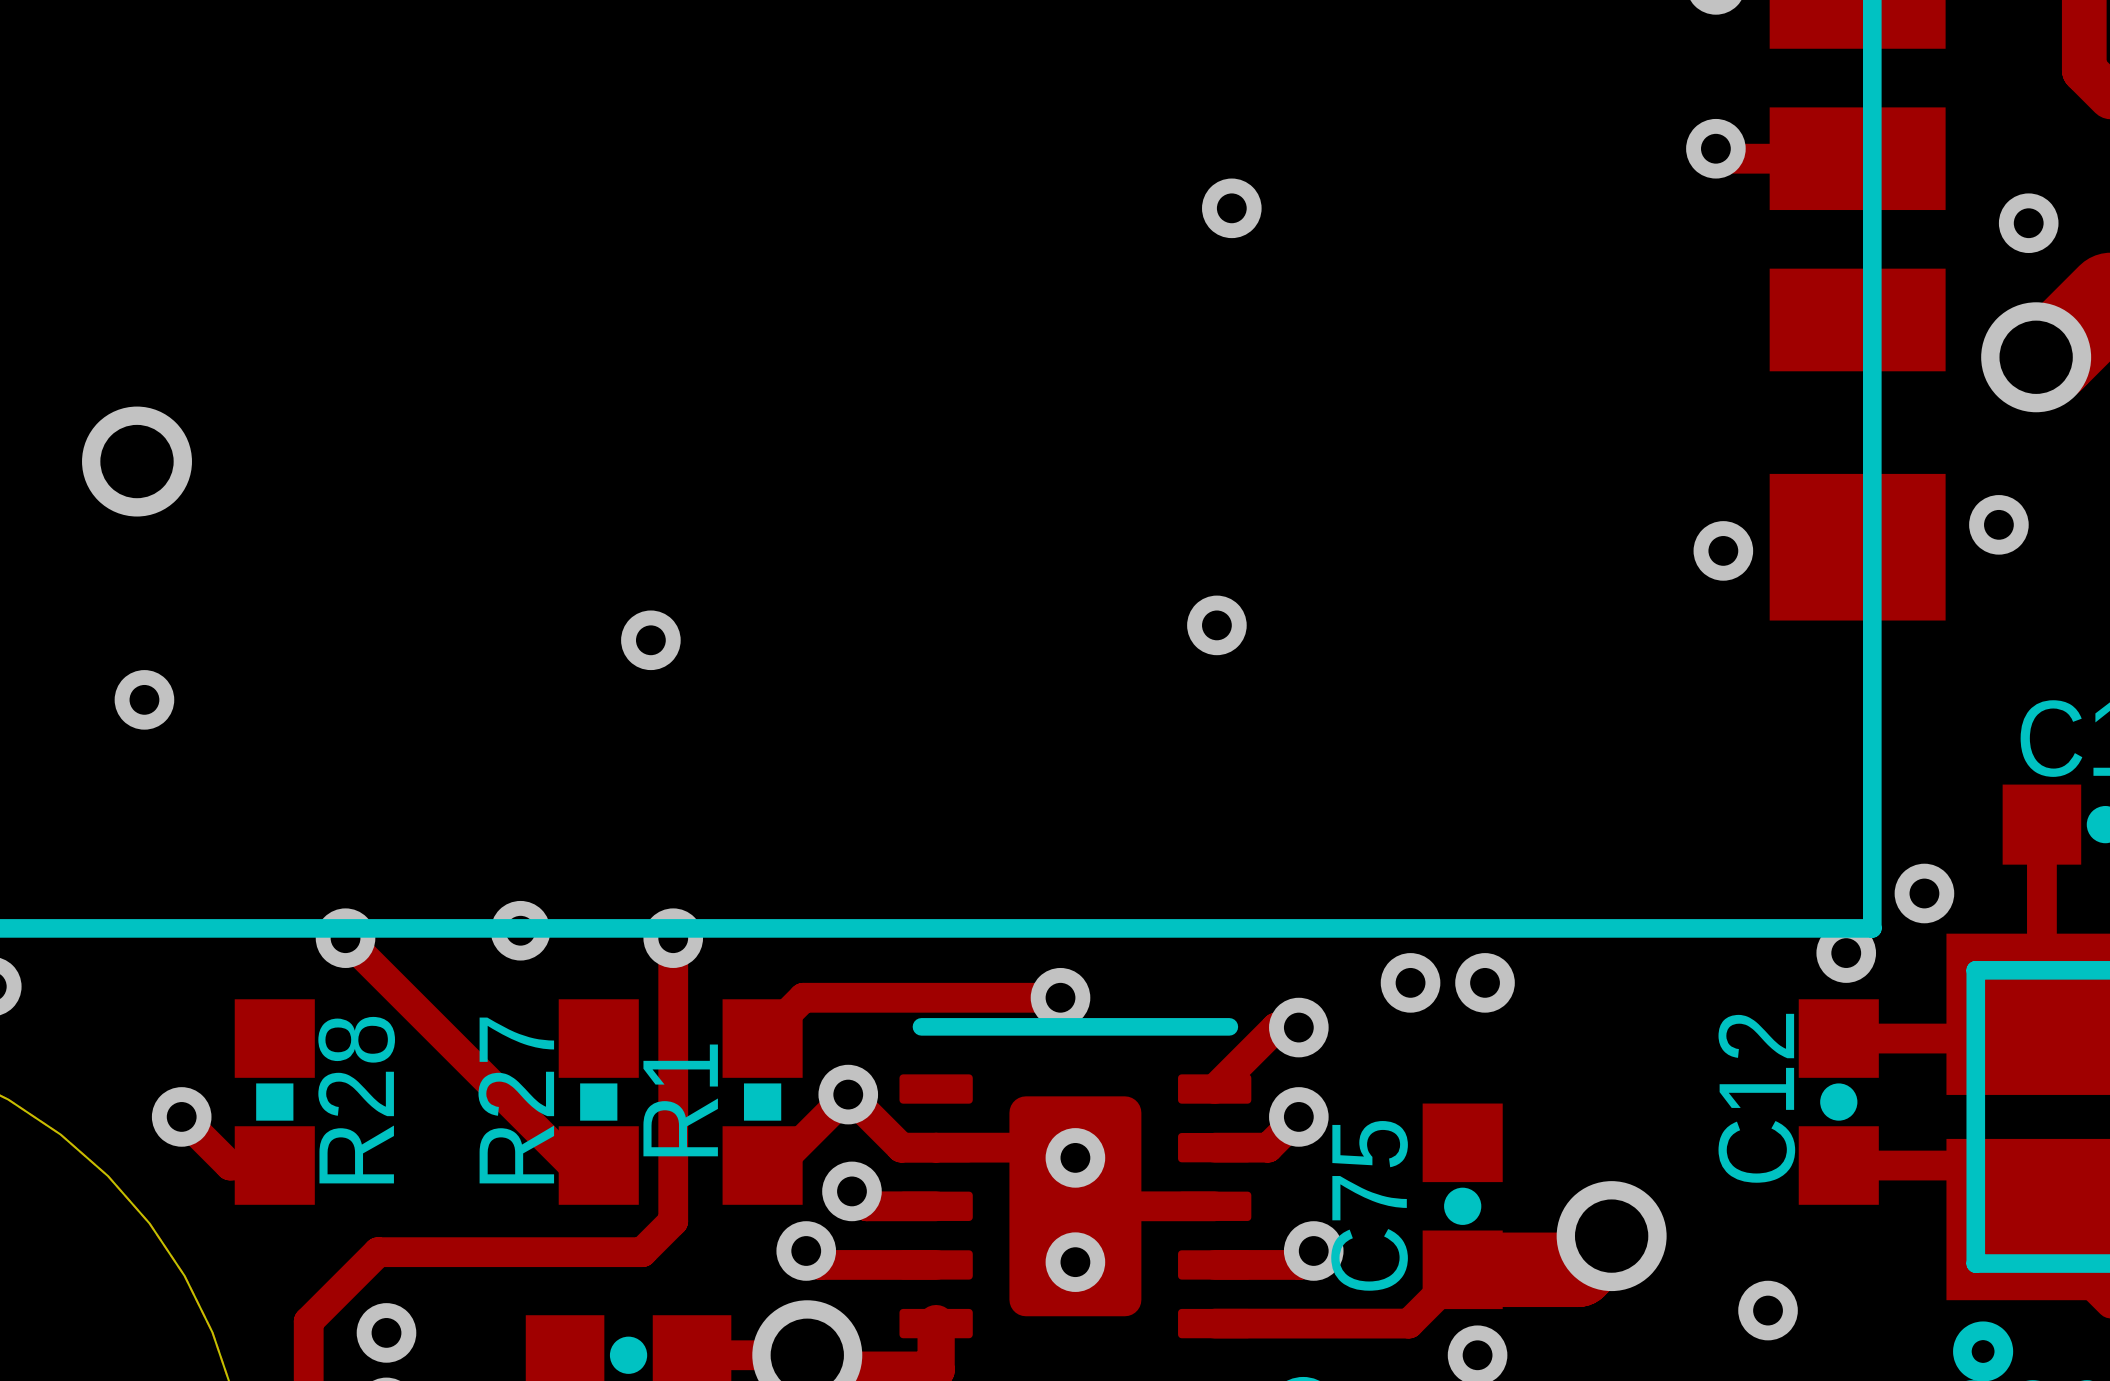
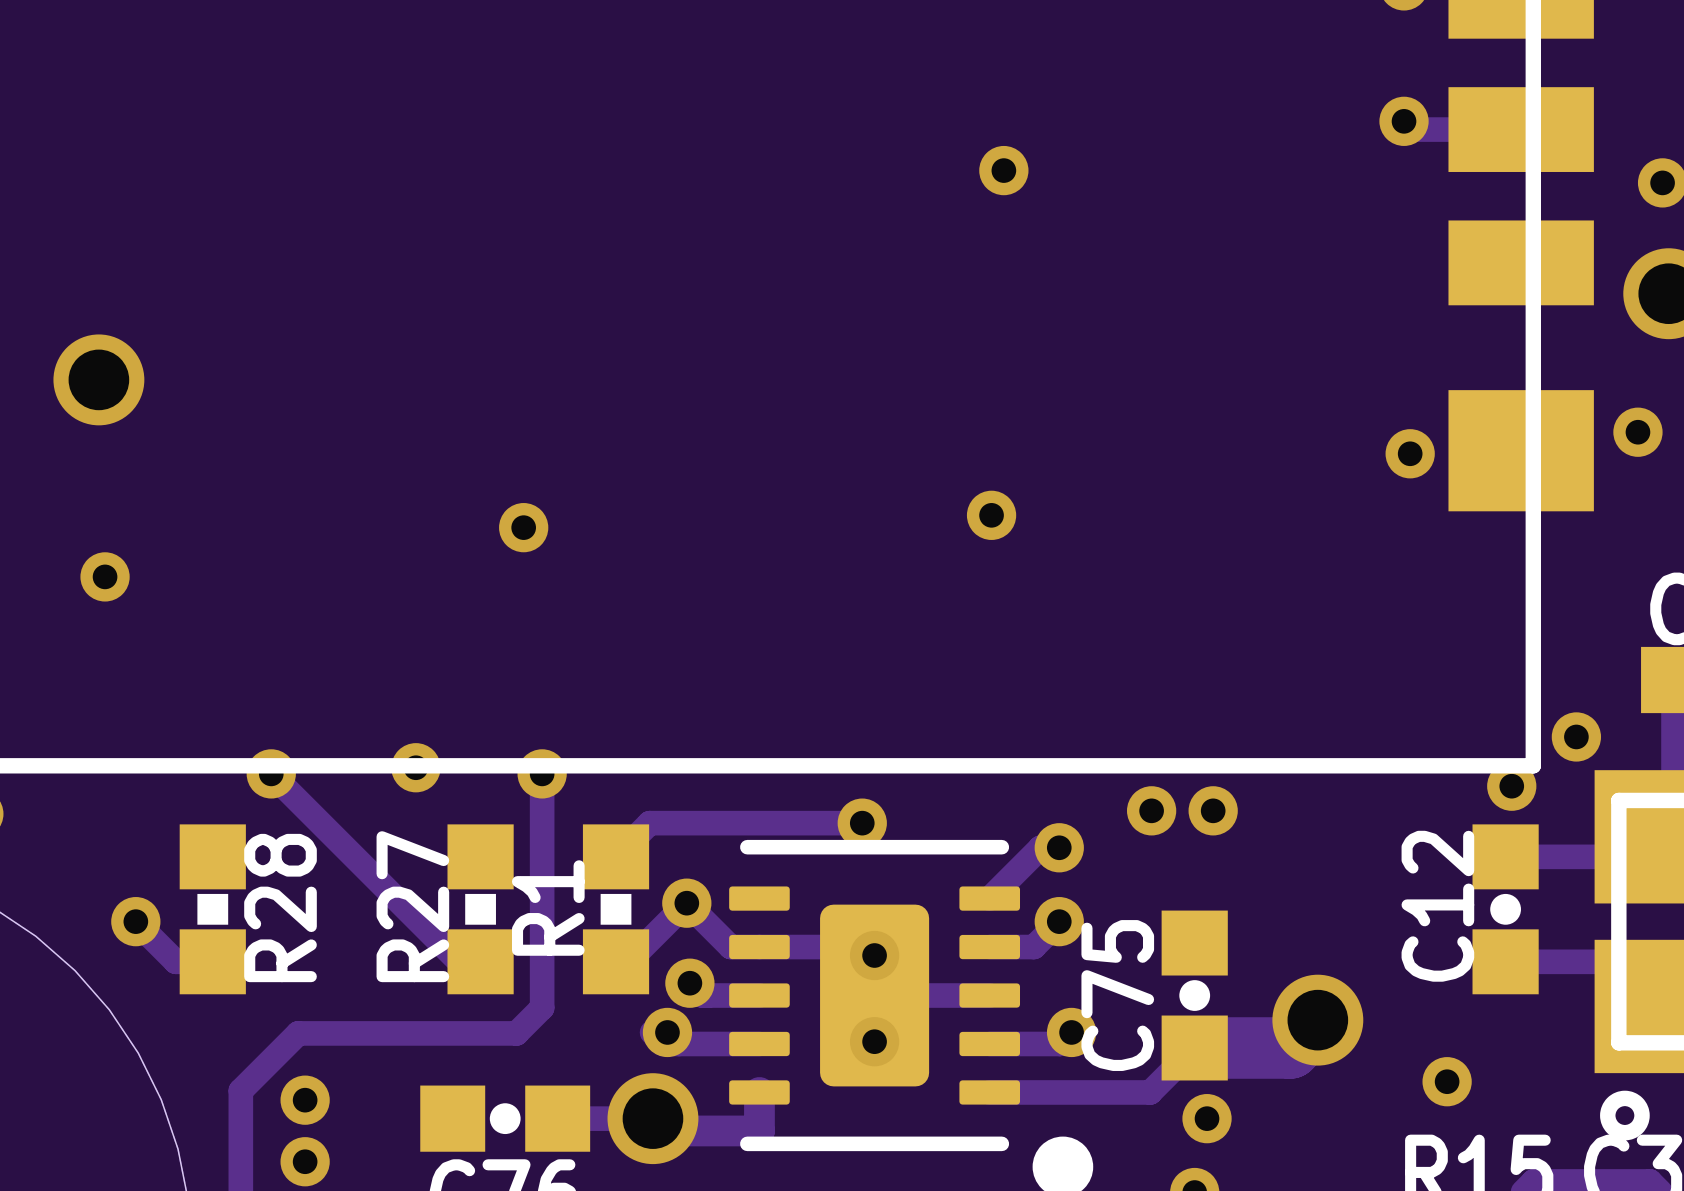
via position: (806, 1250) -> (667, 1032)

